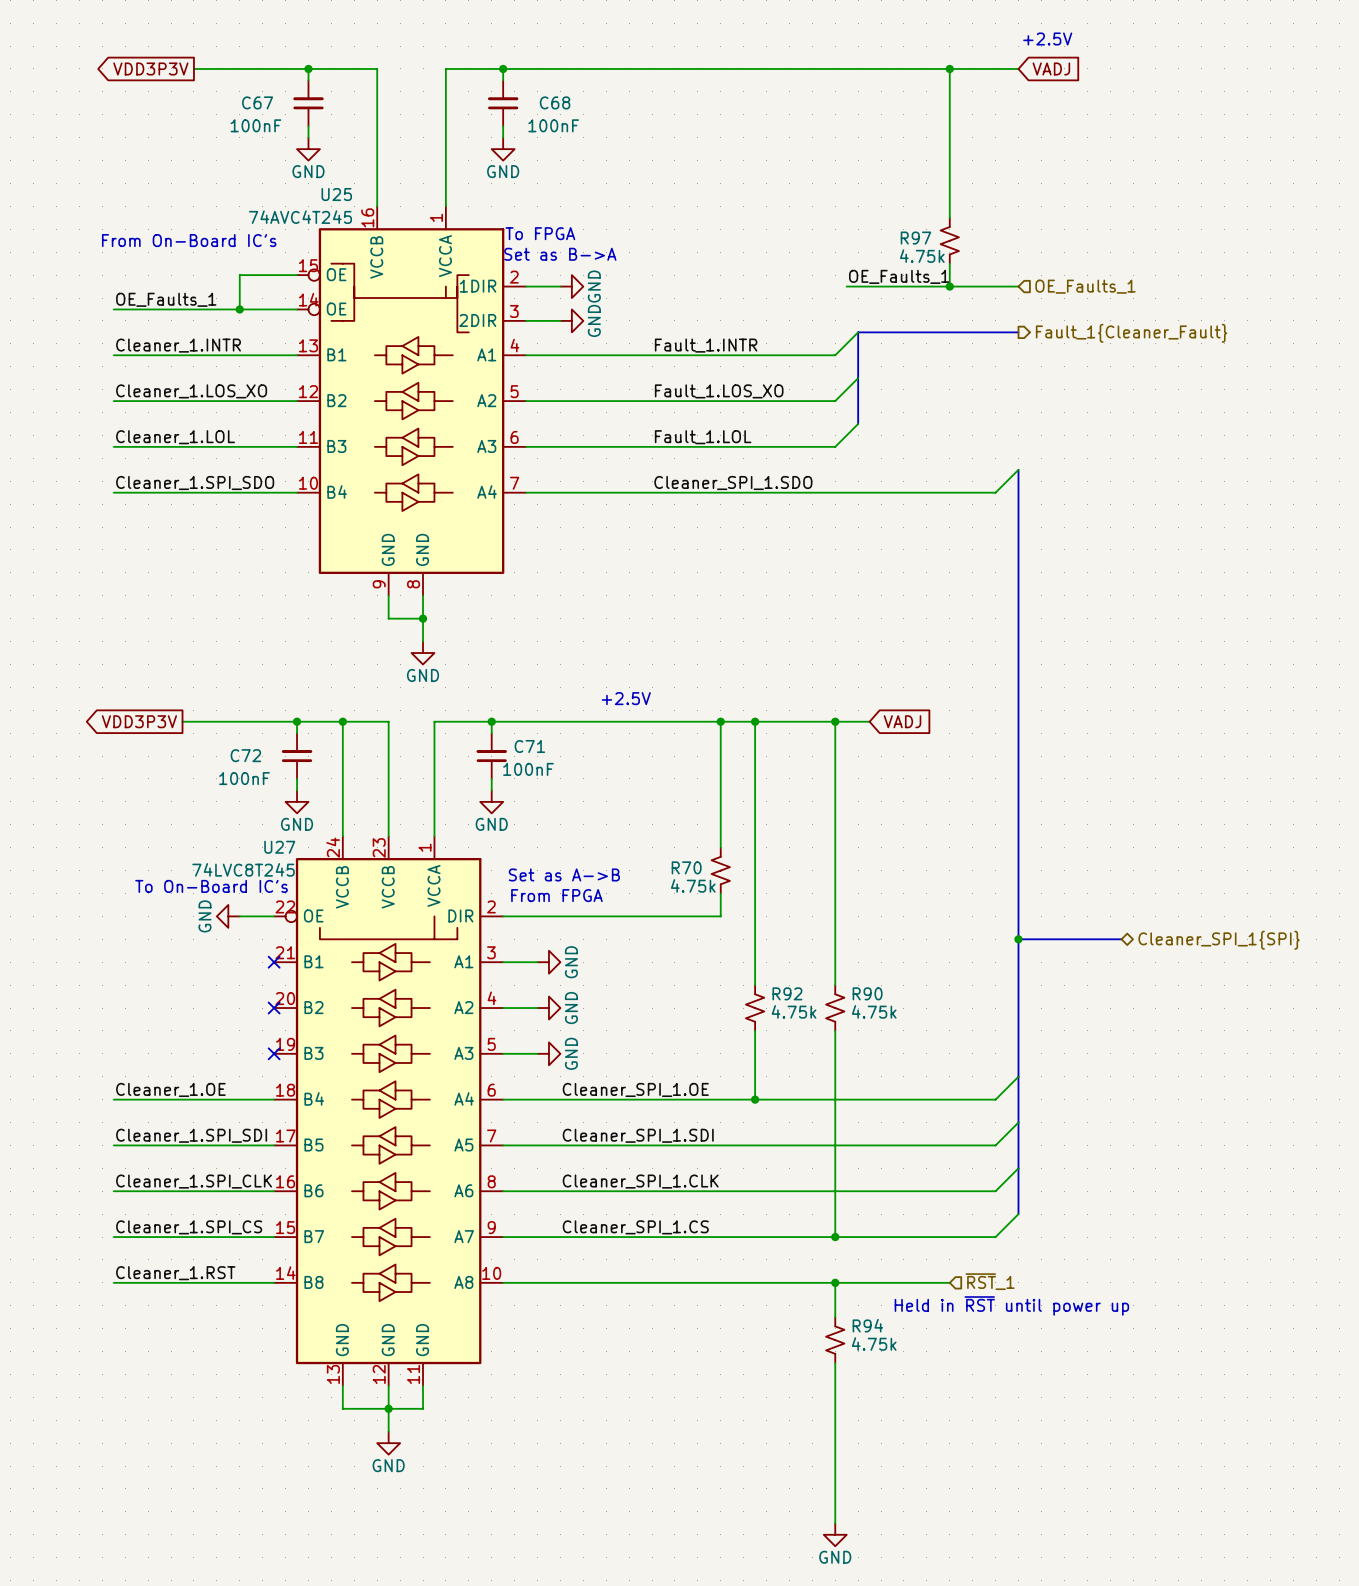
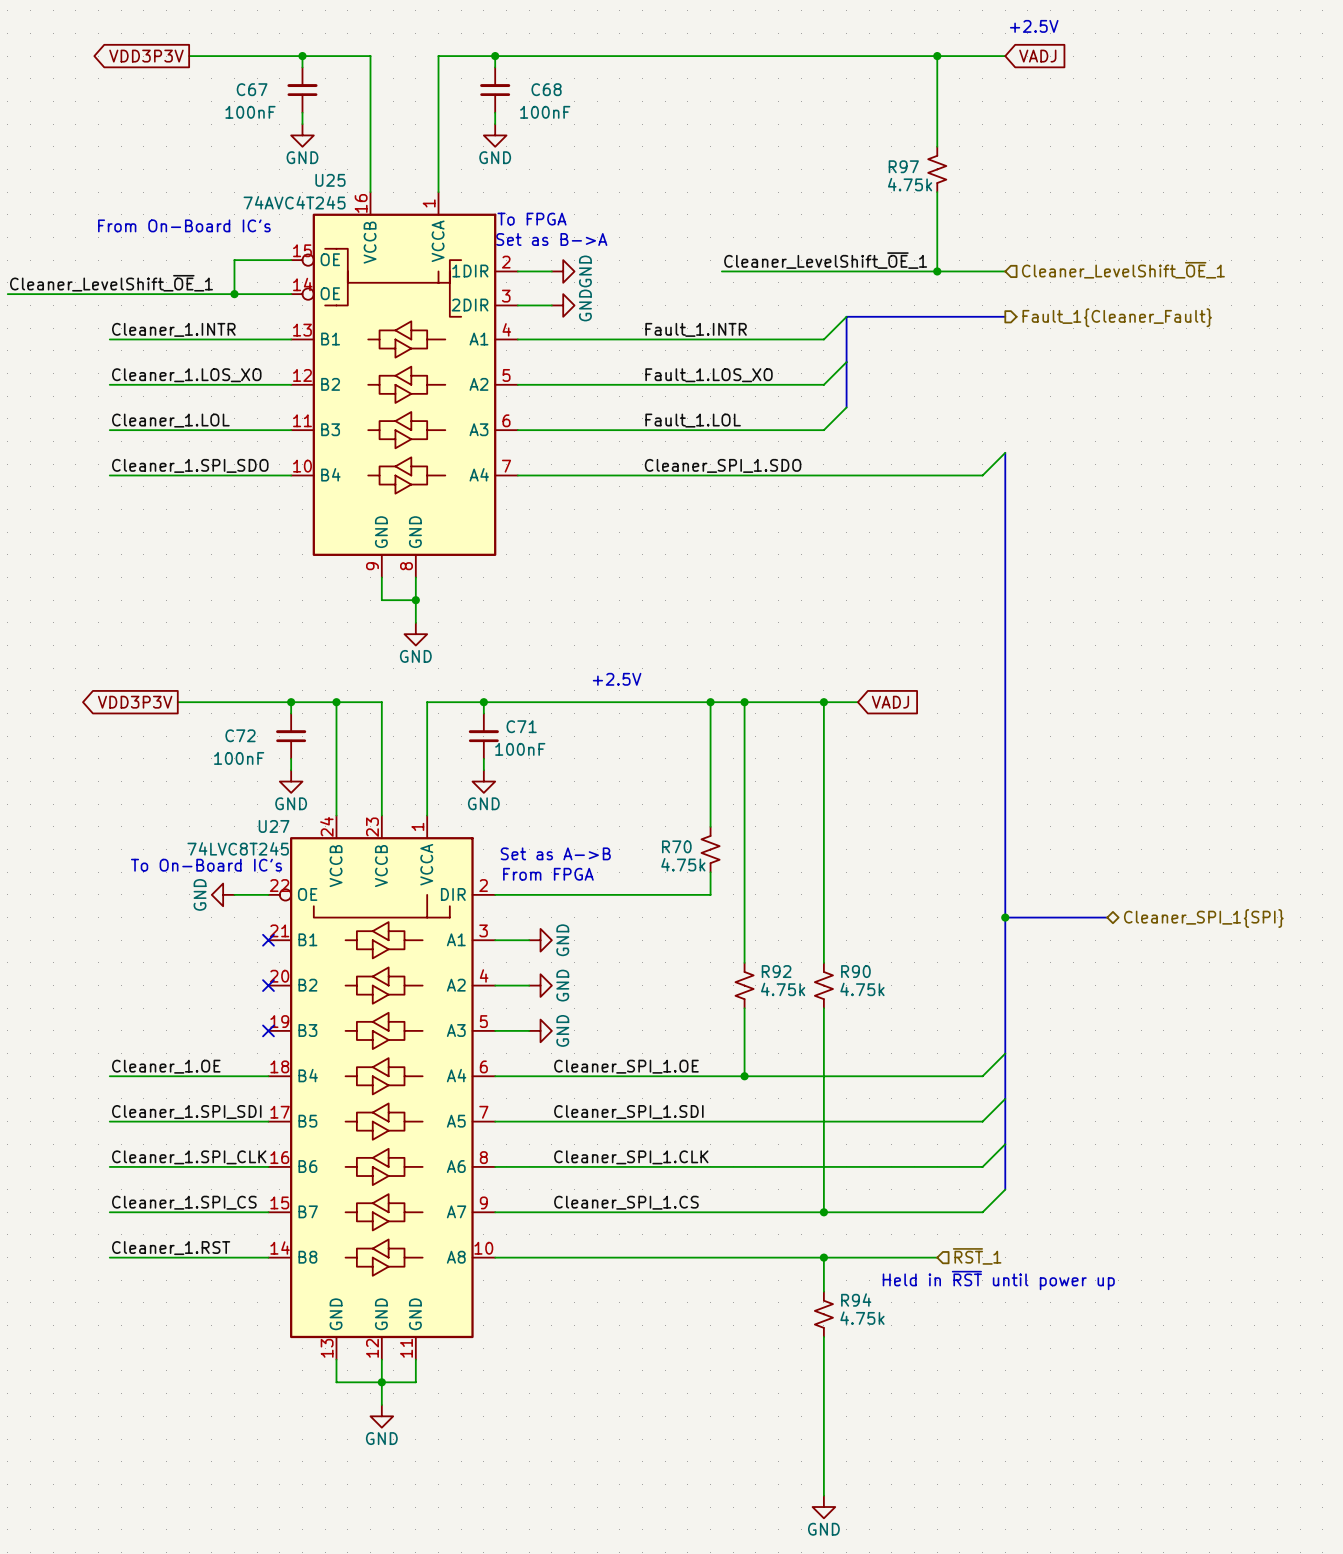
R97 position: (949, 240) -> (937, 169)
label: none -> Cleaner_LevelShift_~{OE}_1 (825, 260)
label: OE_Faults_1 (899, 276) -> none
wire: none -> (721, 271) (835, 271)
hierarchical label: OE_Faults_1 (1085, 286) -> Cleaner_LevelShift_~{OE}_1 (1123, 270)
label: none -> Cleaner_LevelShift_~{OE}_1 (111, 283)
label: OE_Faults_1 (166, 299) -> none
wire: none -> (7, 294) (109, 294)

